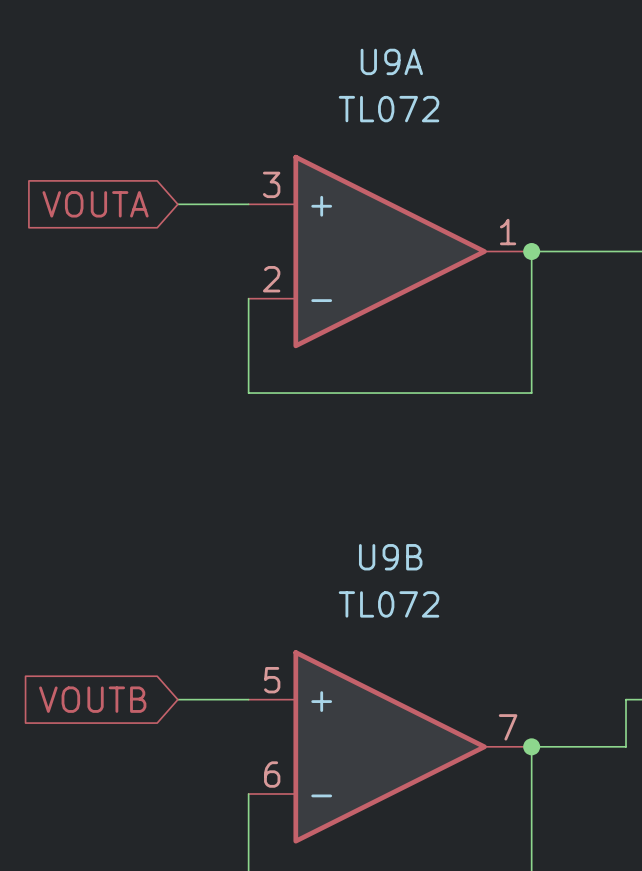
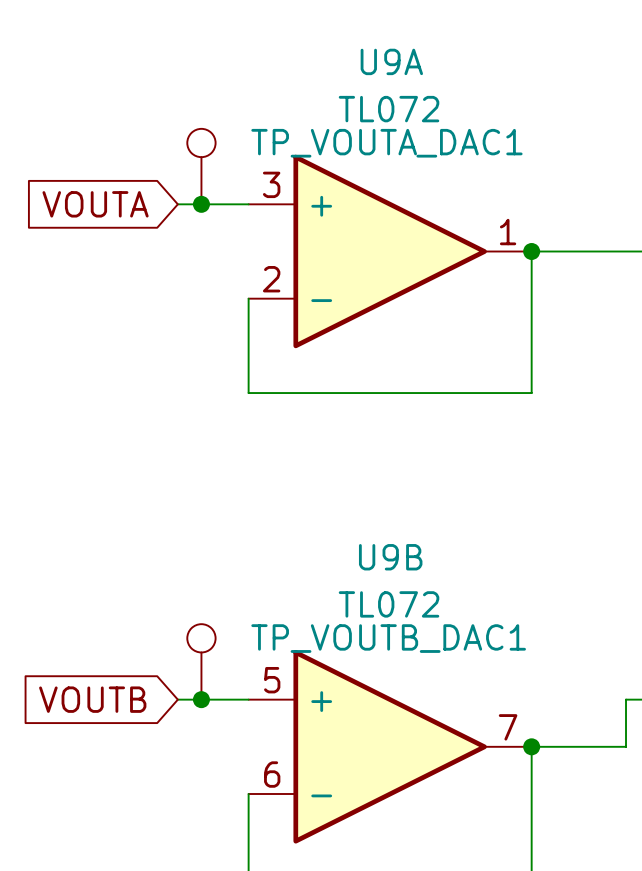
TP_VOUTA_DAC1: none -> (201, 166)
junction: none -> (201, 204)
TP_VOUTB_DAC1: none -> (201, 661)
junction: none -> (201, 699)

